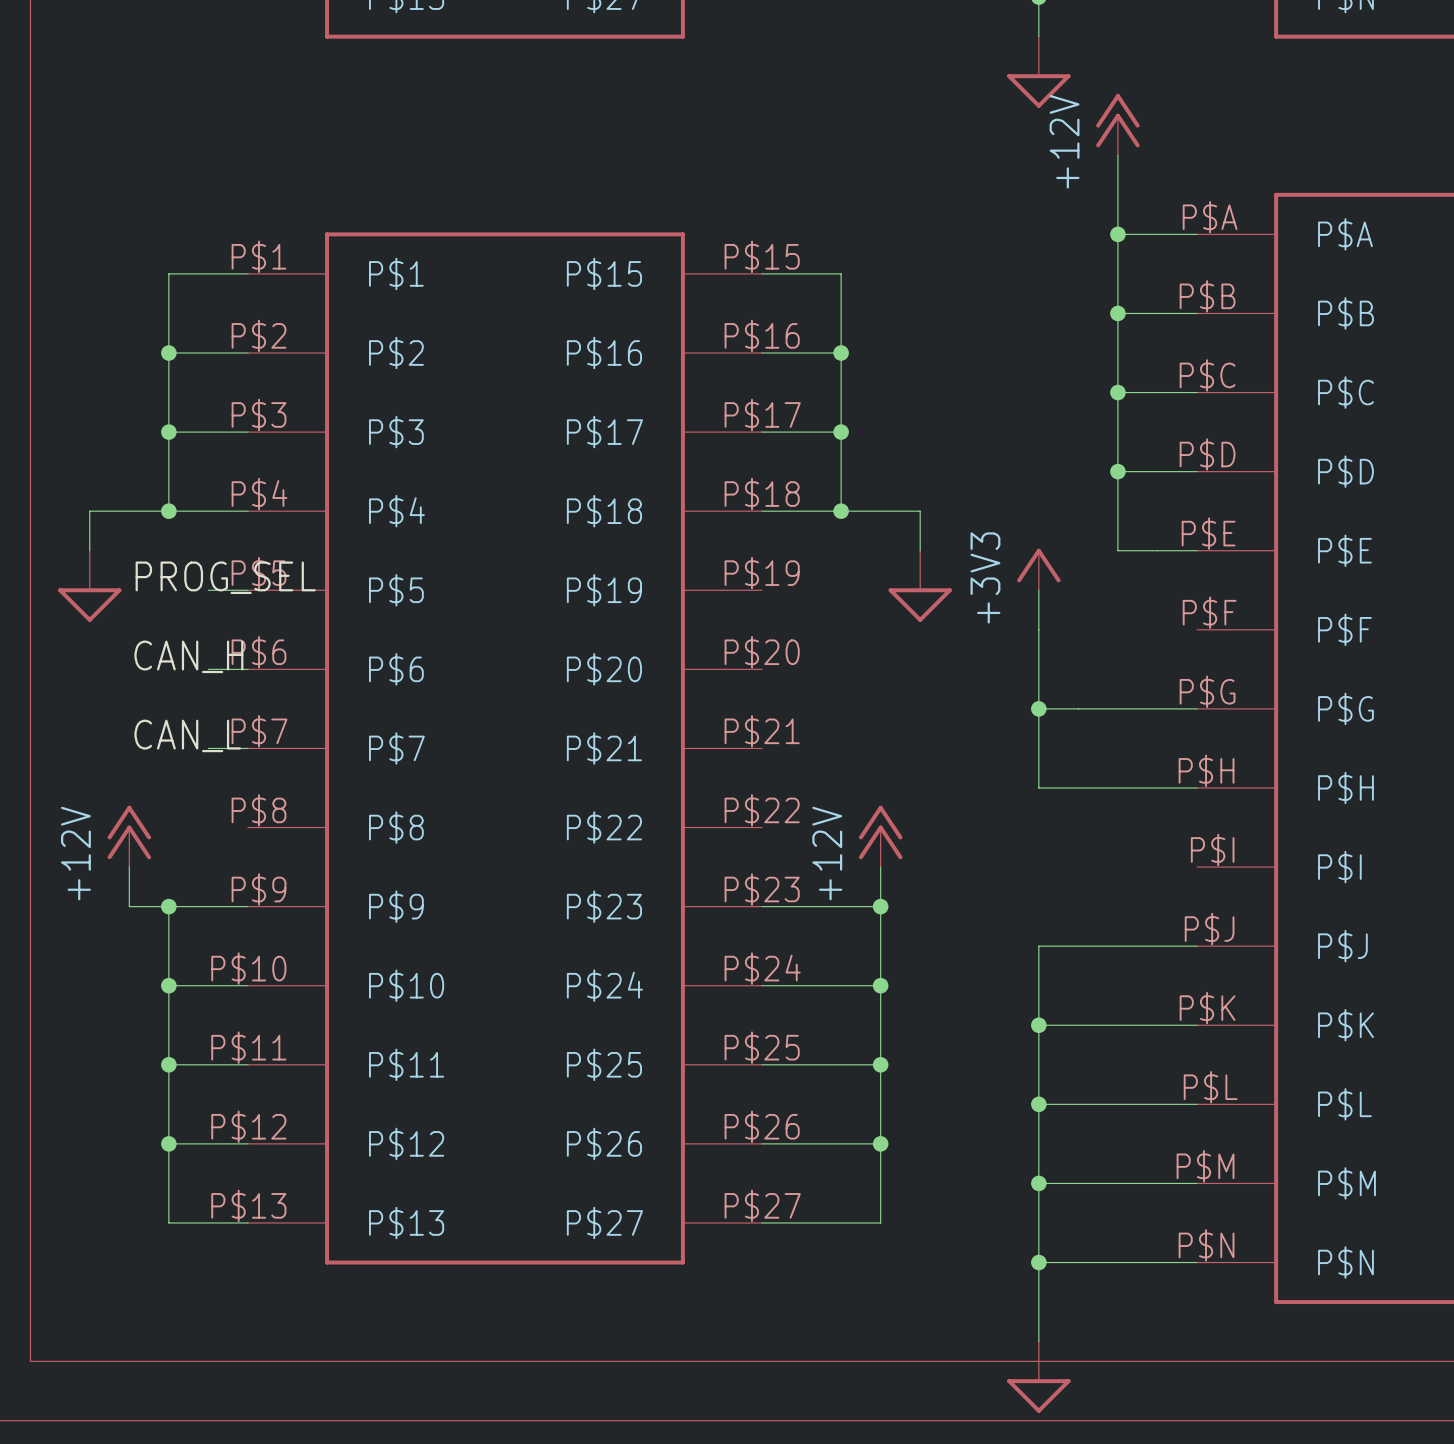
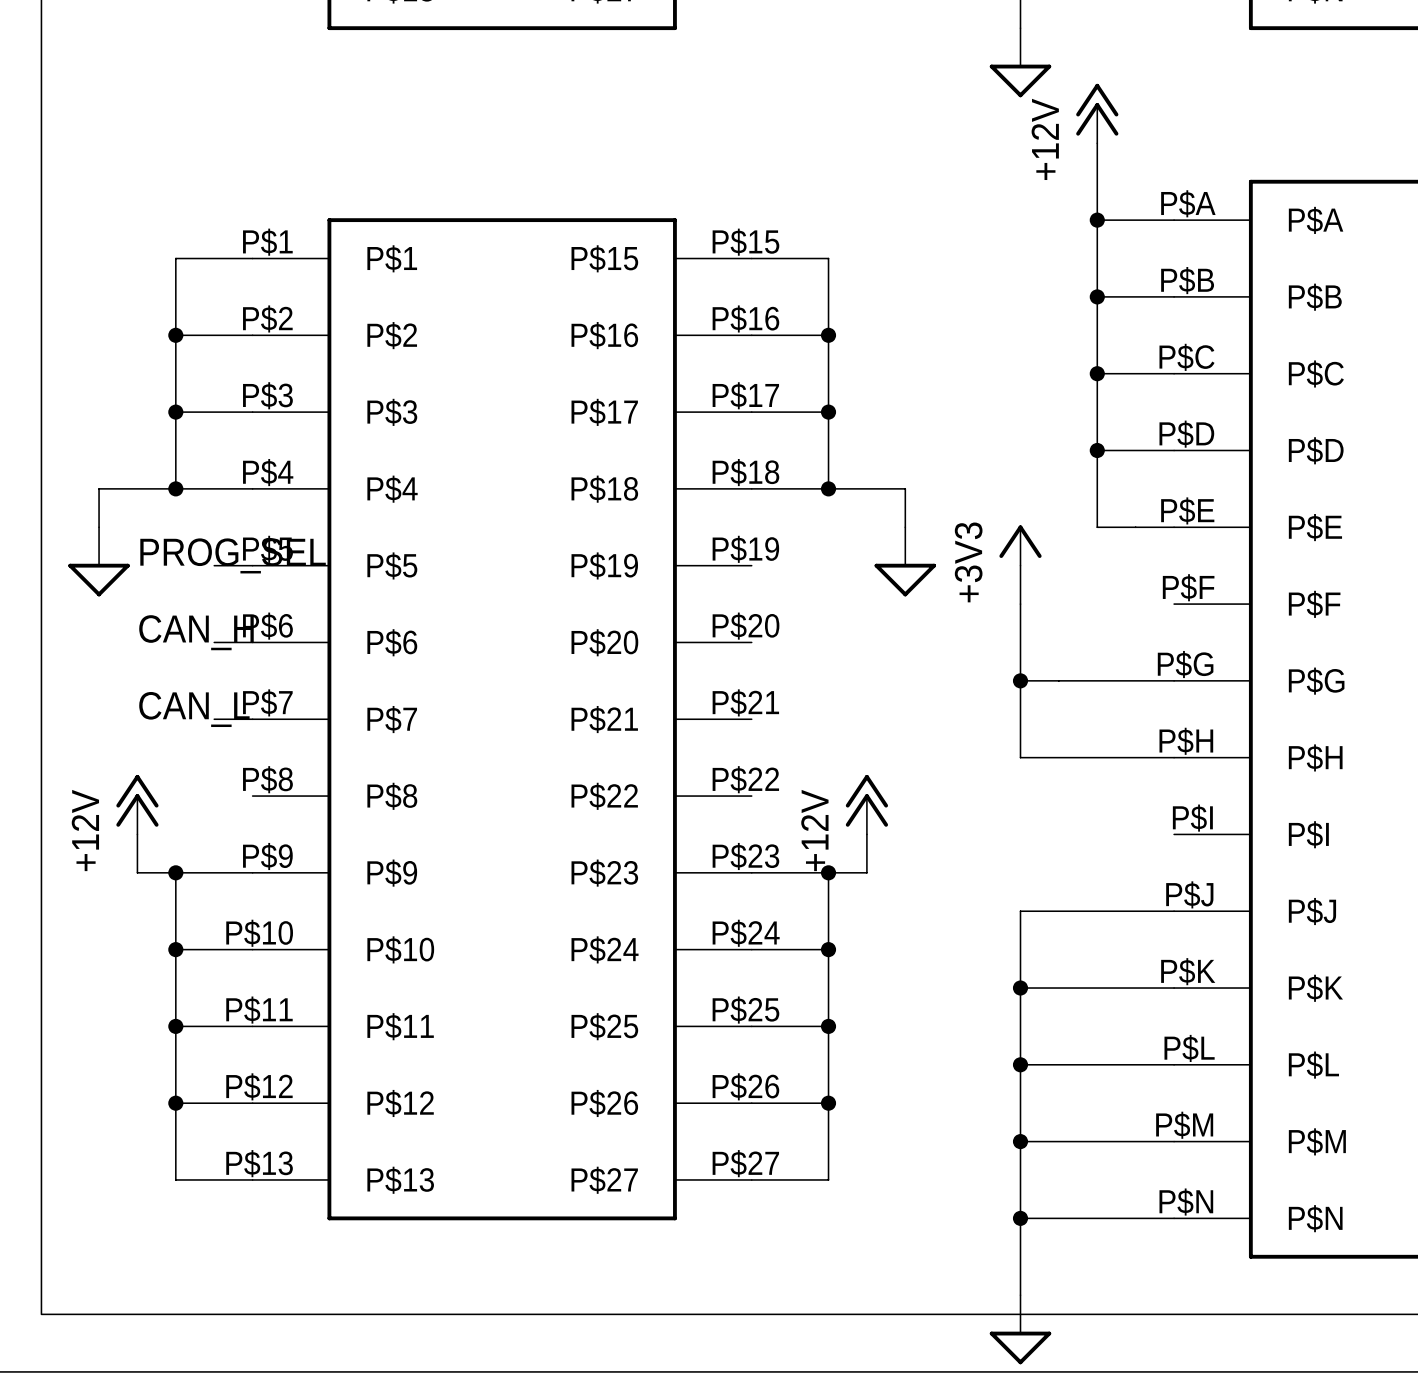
wire: (880, 906) (880, 1222) (841, 1222) -> (828, 872) (828, 1179)
junction position: (880, 906) -> (828, 872)
wire: (841, 985) (880, 985) -> none
junction position: (880, 985) -> (828, 949)
wire: (841, 1064) (880, 1064) -> none
junction position: (880, 1064) -> (828, 1026)
wire: (841, 1143) (880, 1143) -> none
junction position: (880, 1143) -> (828, 1103)

